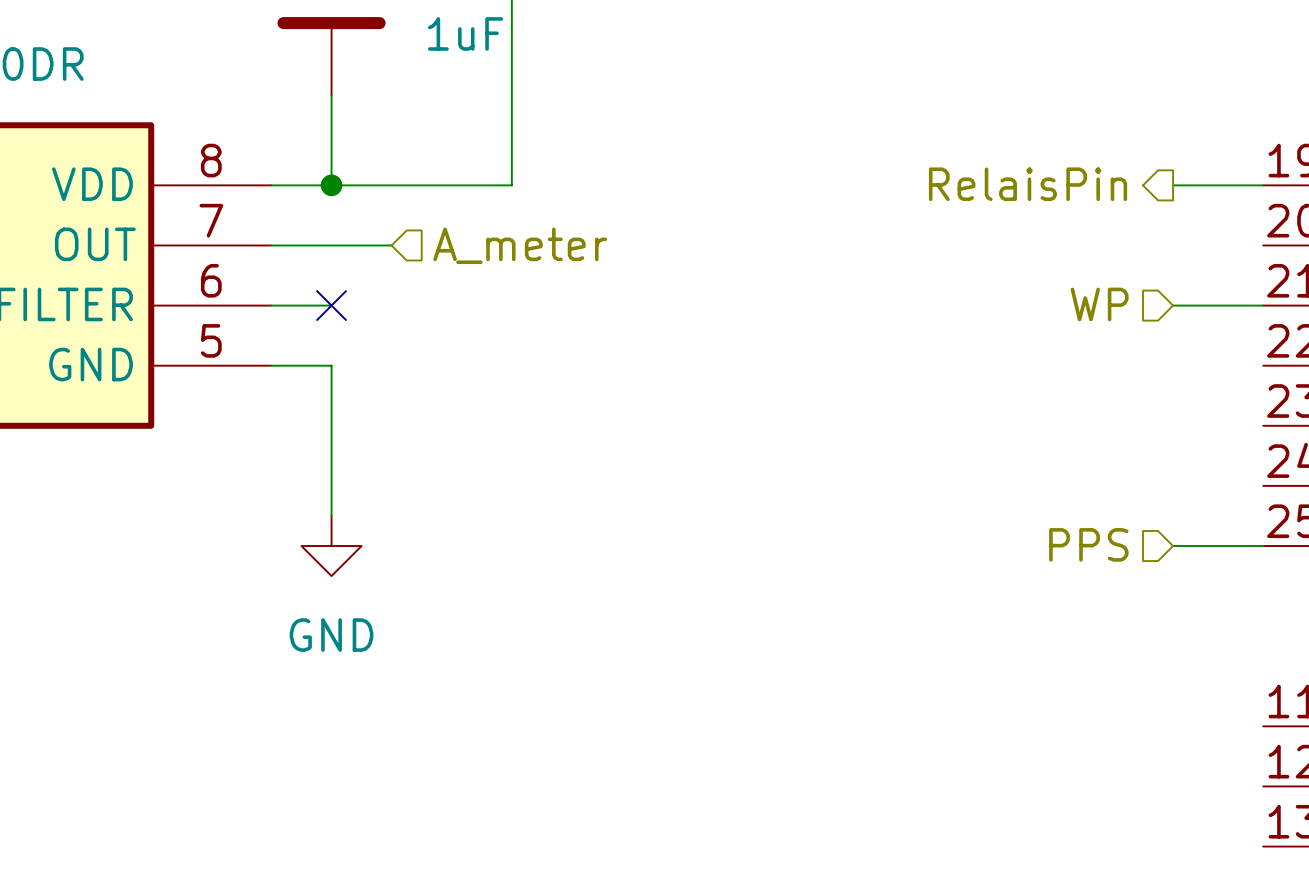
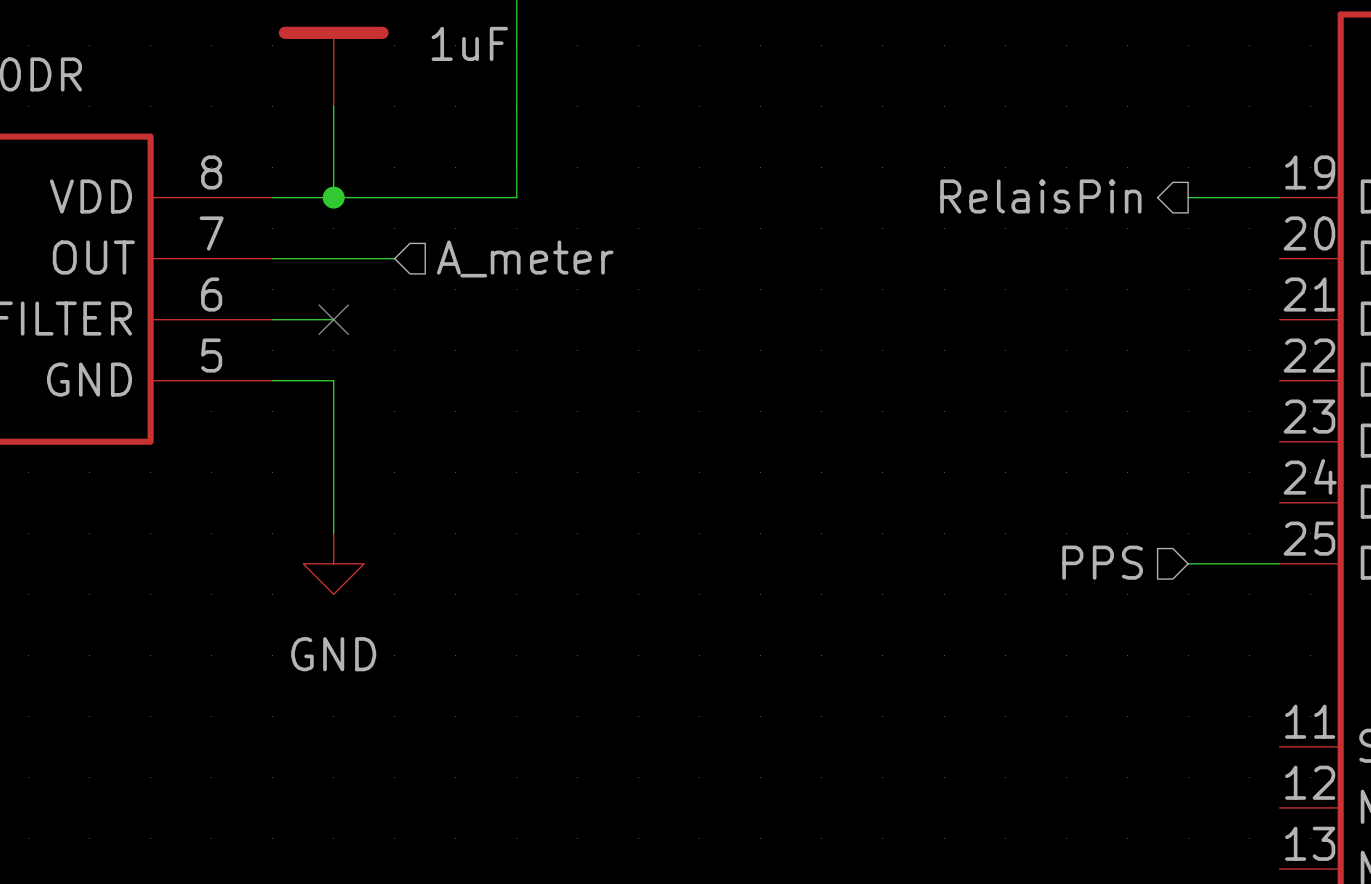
hierarchical label: WP (1099, 304) -> none
wire: (1173, 305) (1263, 305) -> none

